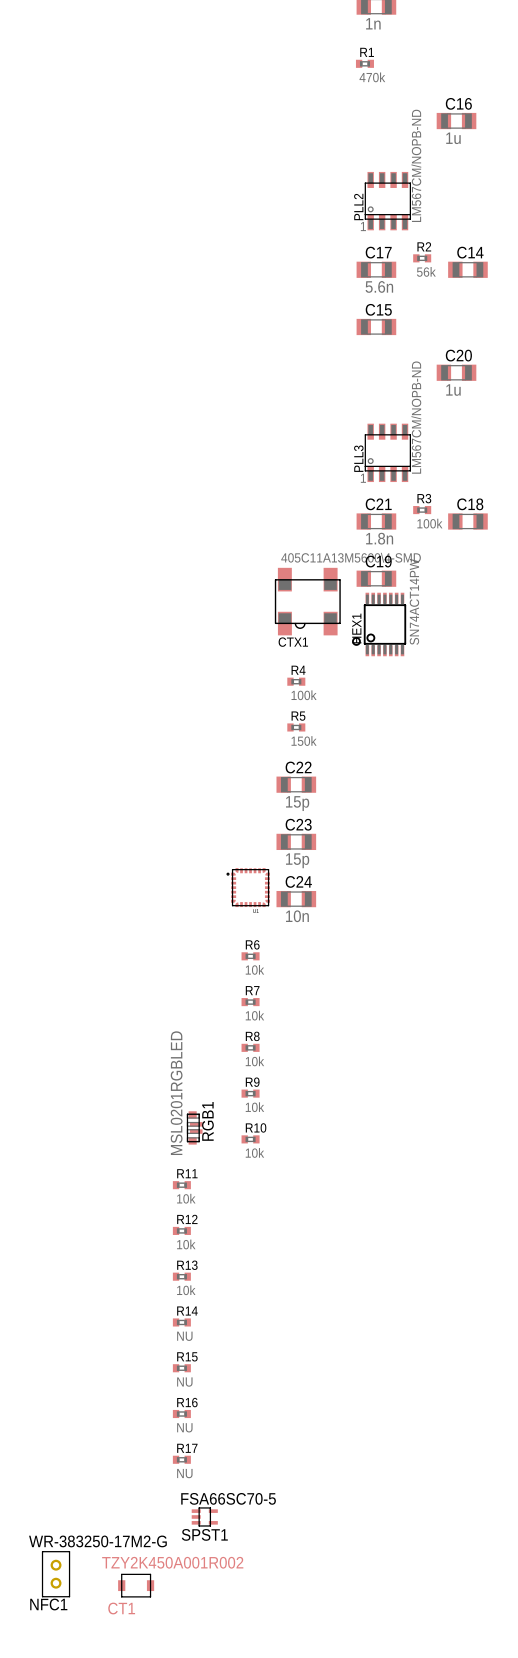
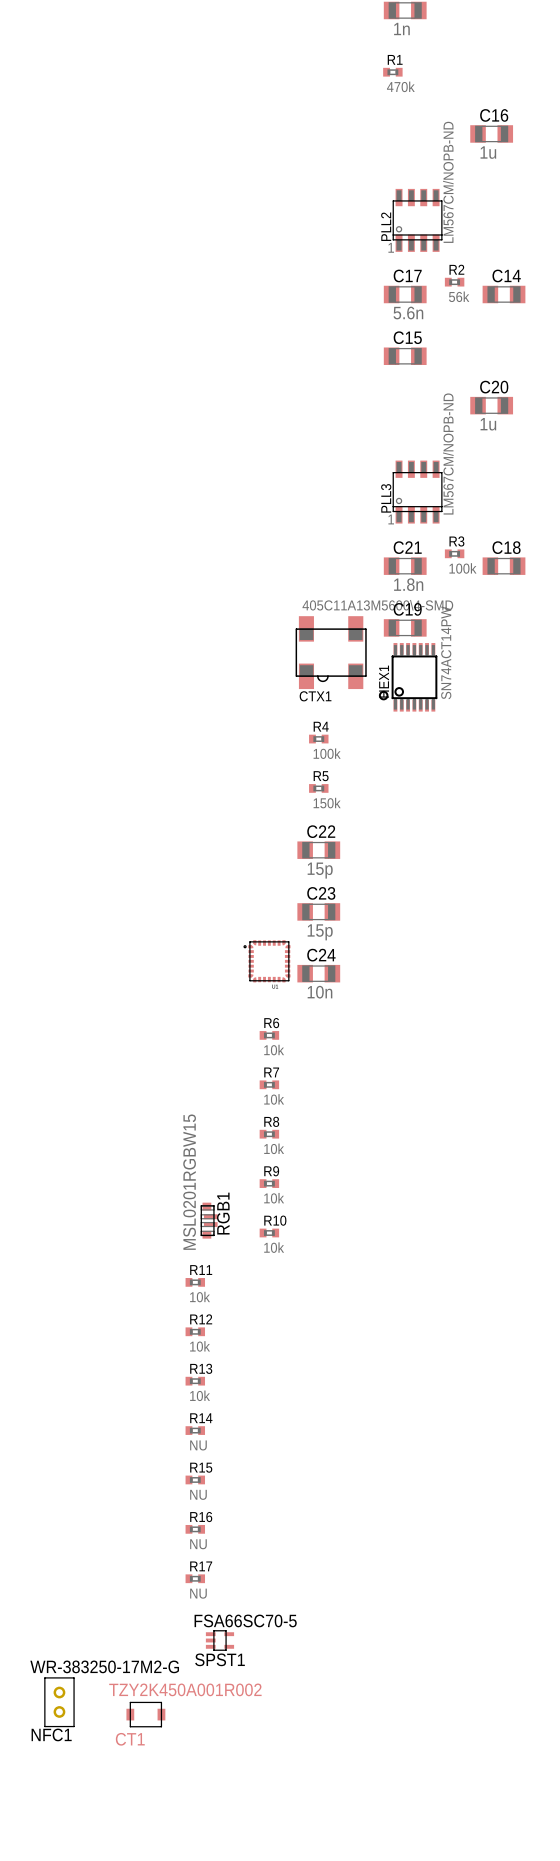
RGB1 value: MSL0201RGBLED (176, 1093) -> MSL0201RGBW15 (189, 1182)

